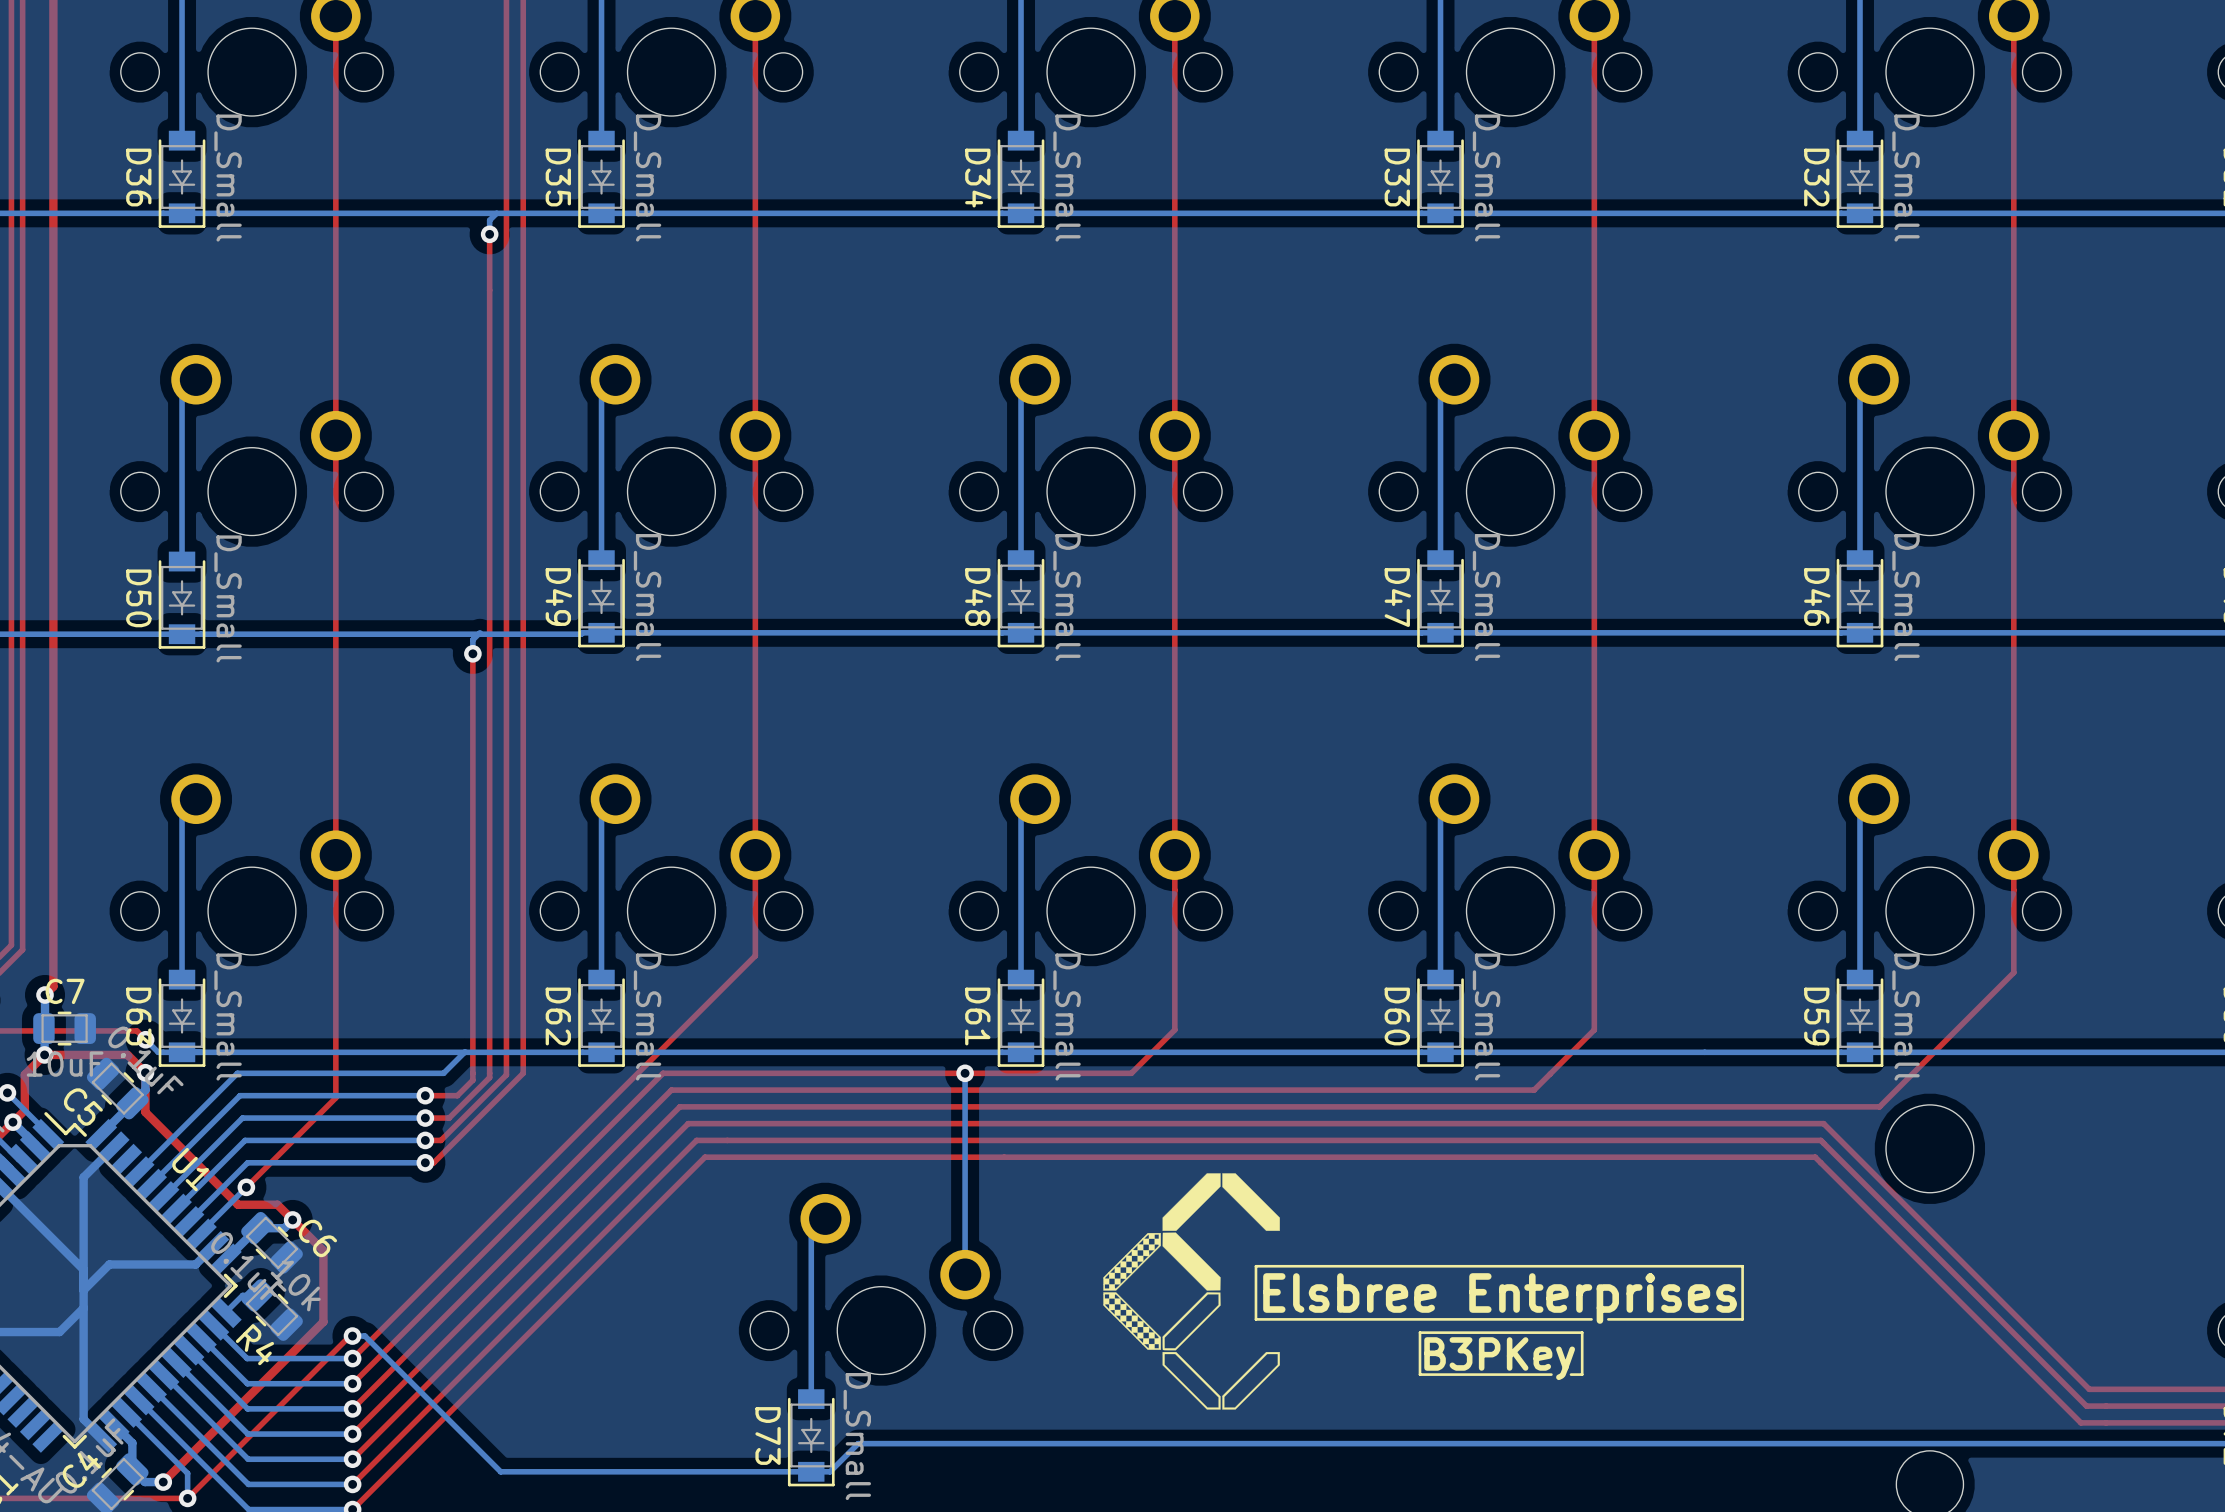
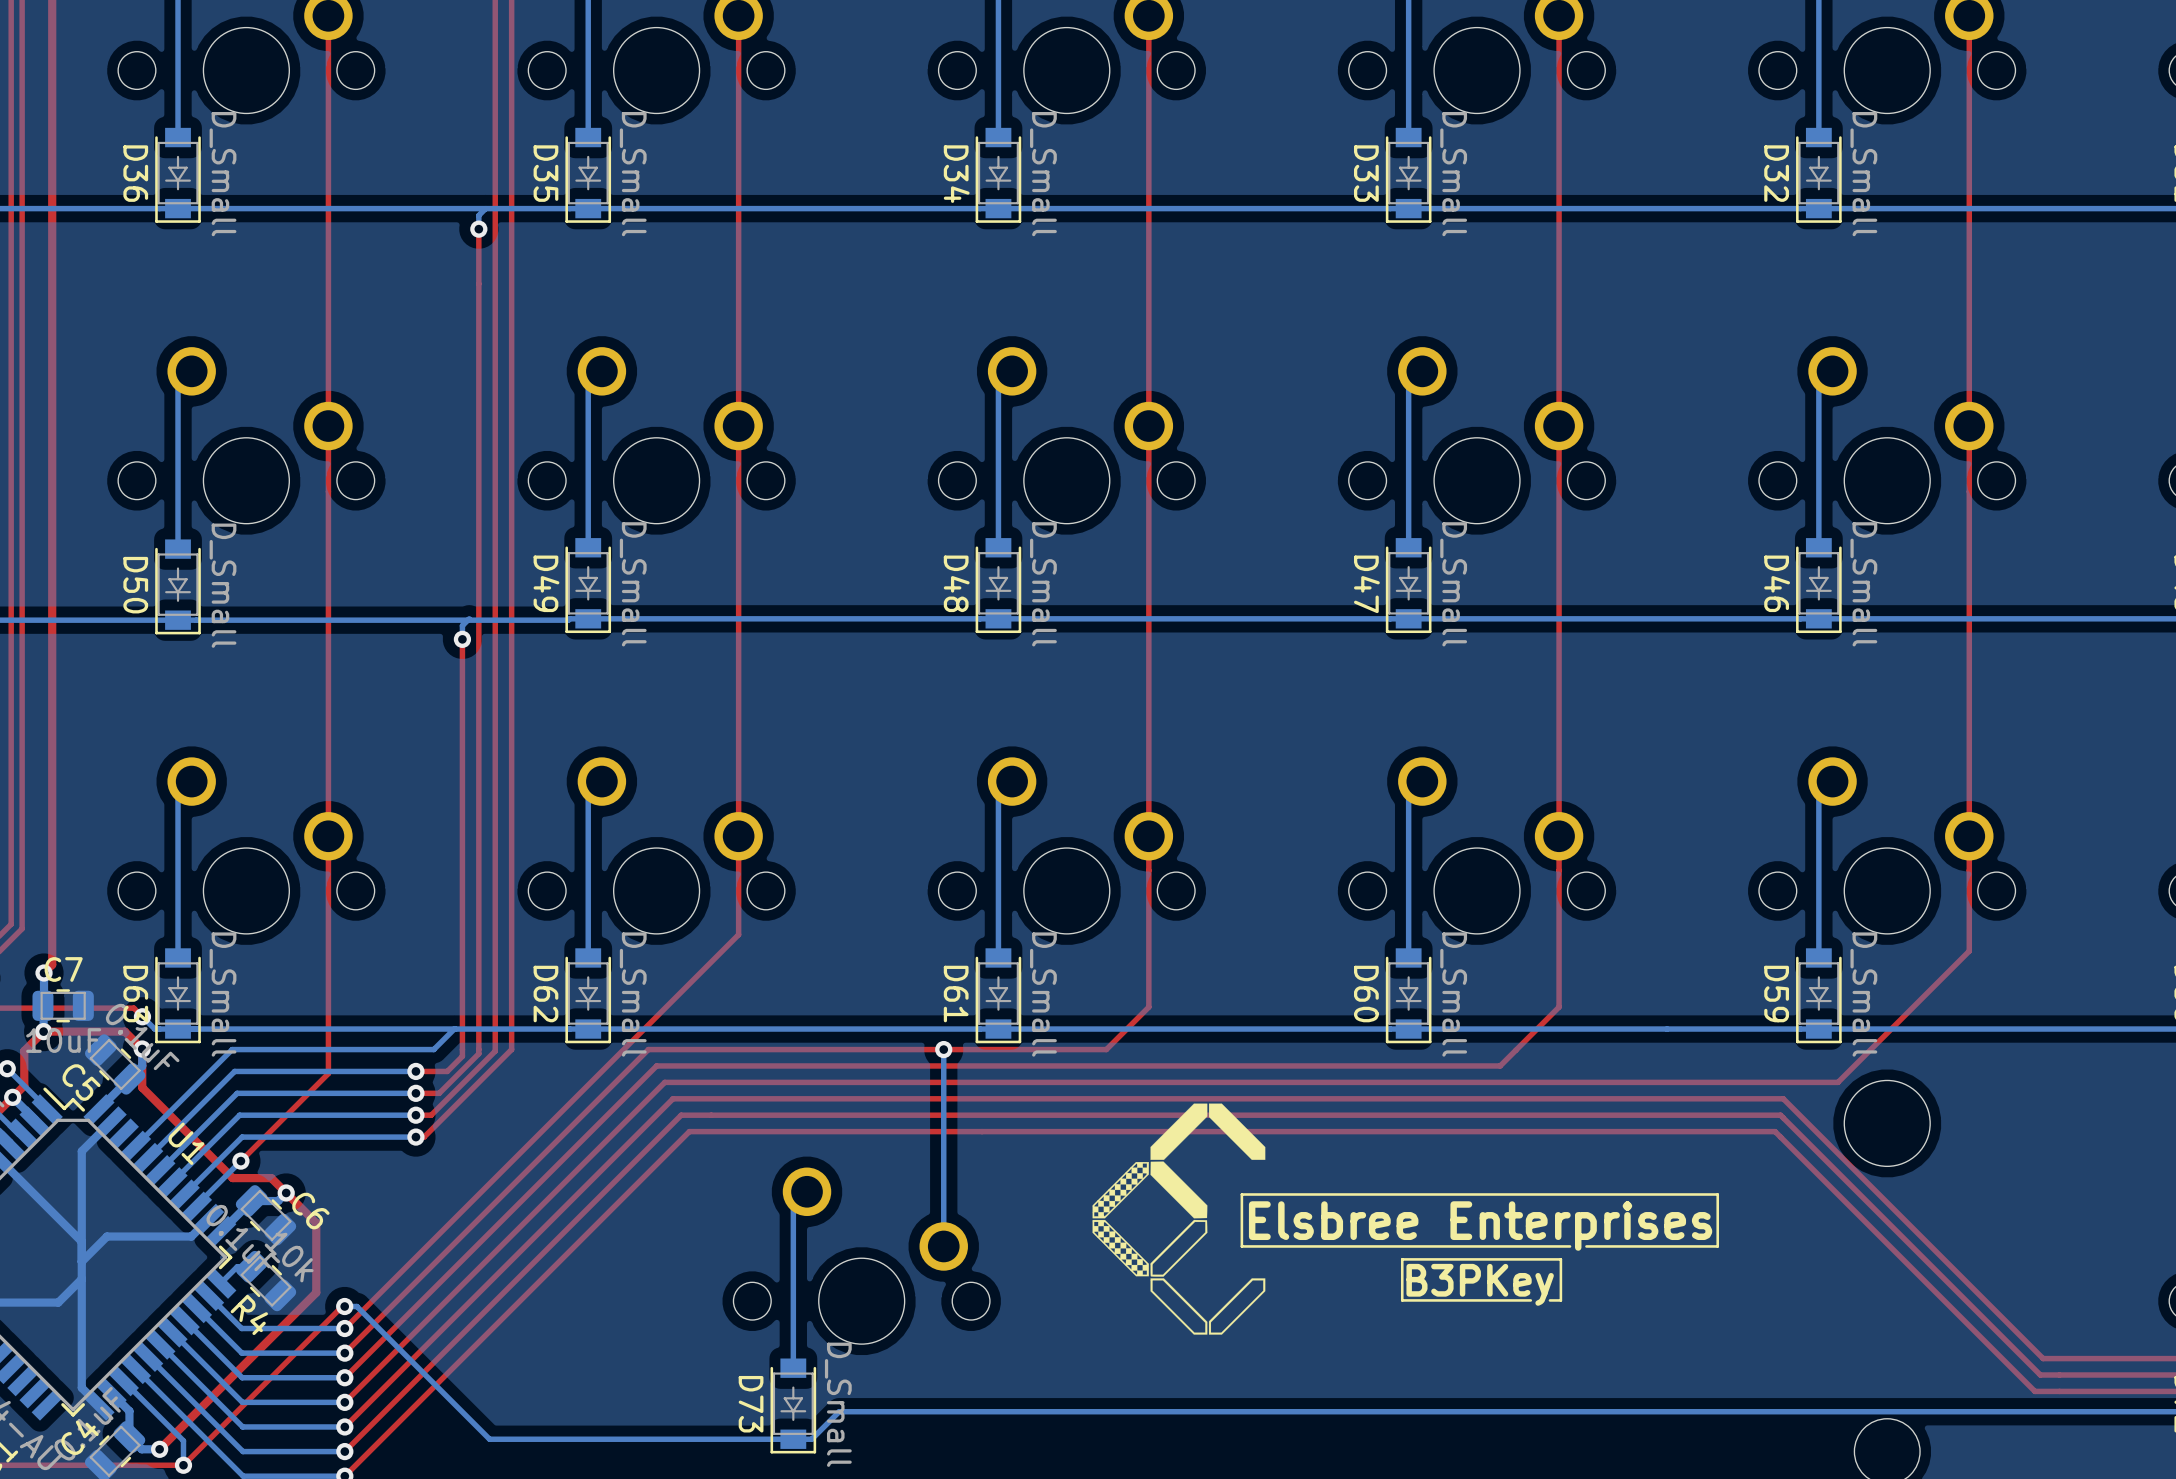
text: none -> Elsbree Enterprises (1480, 1226)
drawing position: (1191, 1291) -> (1178, 1219)
text: Elsbree Enterprises (1500, 1298) -> B3PKey (1480, 1284)
line: (1608, 1319) (1742, 1319) (1742, 1266) (1255, 1266) (1255, 1319) (1591, 1319) -> (1586, 1246) (1717, 1246) (1717, 1194) (1241, 1194) (1241, 1246) (1570, 1246)
text: B3PKey (1499, 1358) -> none
line: (1571, 1374) (1582, 1374) (1582, 1332) (1420, 1332) (1420, 1374) (1551, 1374) -> (1549, 1300) (1560, 1300) (1560, 1259) (1402, 1259) (1402, 1300) (1530, 1300)

